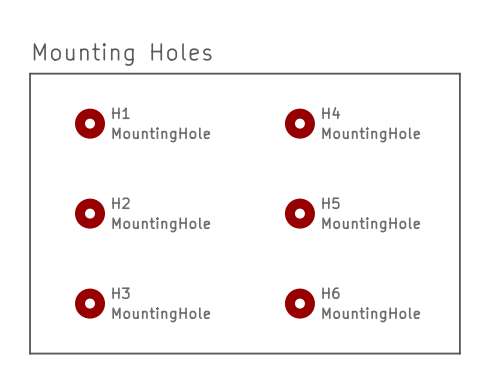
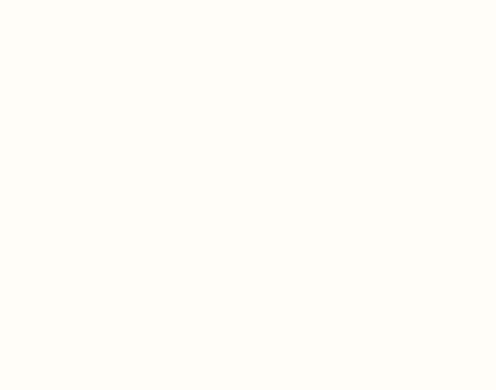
text: Mounting Holes (122, 54) -> none
line: (30, 73) (459, 73) (459, 353) (30, 353) (30, 73) -> none
H1: MountingHole (90, 123) -> none
H4: MountingHole (299, 123) -> none
H2: MountingHole (90, 213) -> none
H5: MountingHole (299, 213) -> none
H3: MountingHole (90, 303) -> none
H6: MountingHole (299, 303) -> none

